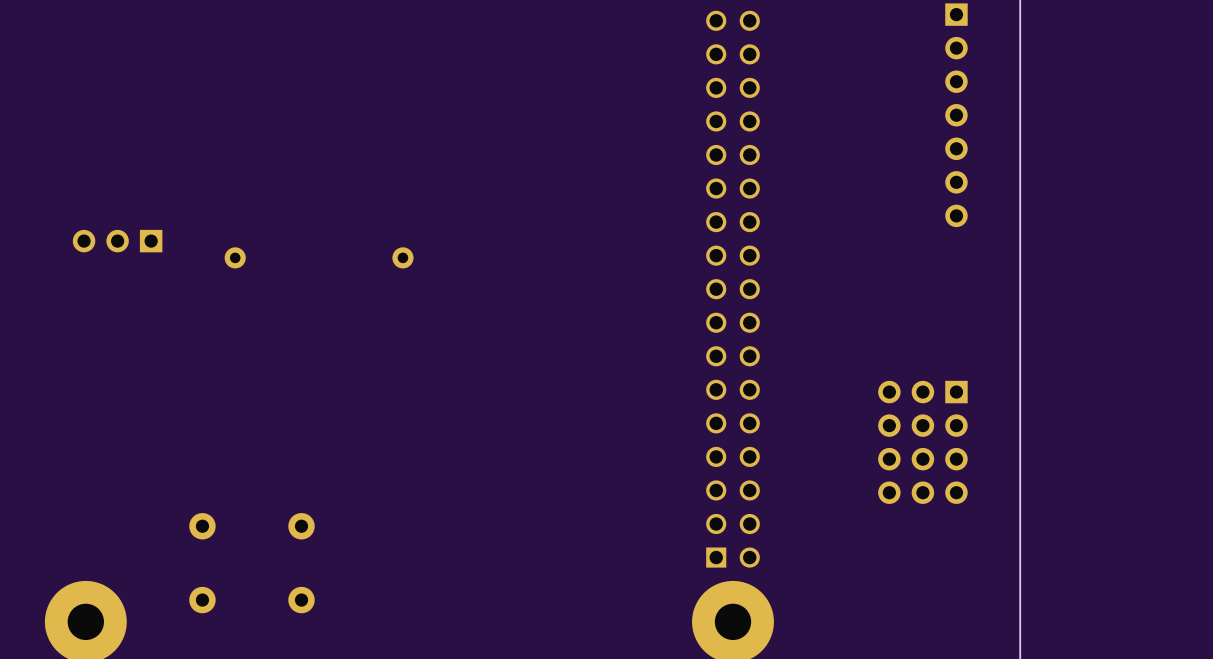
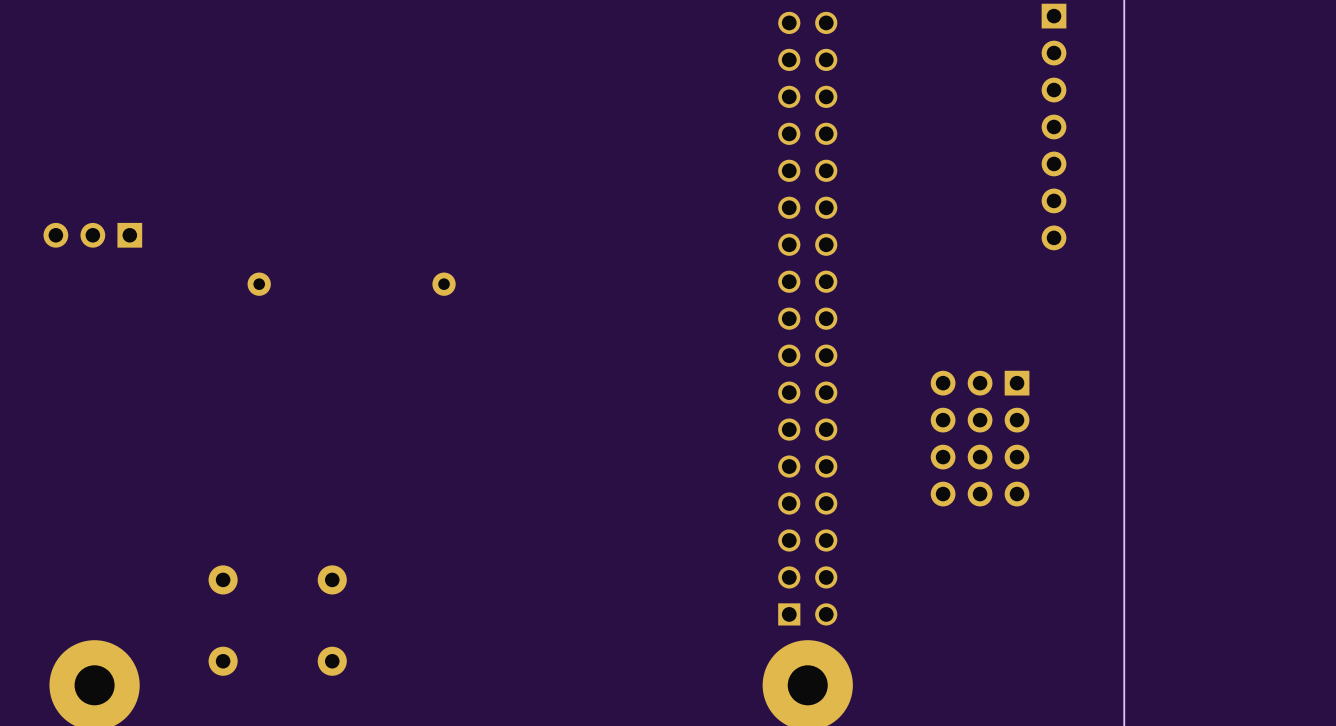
part position: (117, 241) -> (92, 235)
part position: (922, 442) -> (980, 438)

